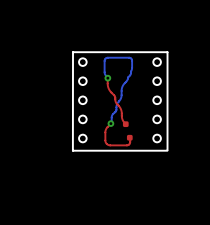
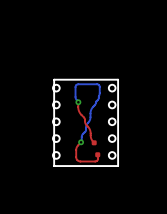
board edge: none -> (54, 79) (54, 166) (118, 166) (118, 79) (54, 79)
round board edge: none -> [107, 83, 117, 93]
round board edge: [152, 57, 162, 67] -> none
round board edge: none -> [107, 100, 117, 110]
round board edge: [152, 76, 162, 86] -> none
round board edge: none -> [107, 117, 117, 126]
round board edge: [152, 95, 162, 106] -> none
round board edge: none -> [107, 134, 117, 143]
round board edge: [152, 114, 162, 125] -> none
round board edge: none -> [107, 151, 117, 160]
round board edge: [152, 133, 162, 144] -> none
board edge: (167, 150) (167, 52) (73, 52) (72, 150) (167, 150) -> none

